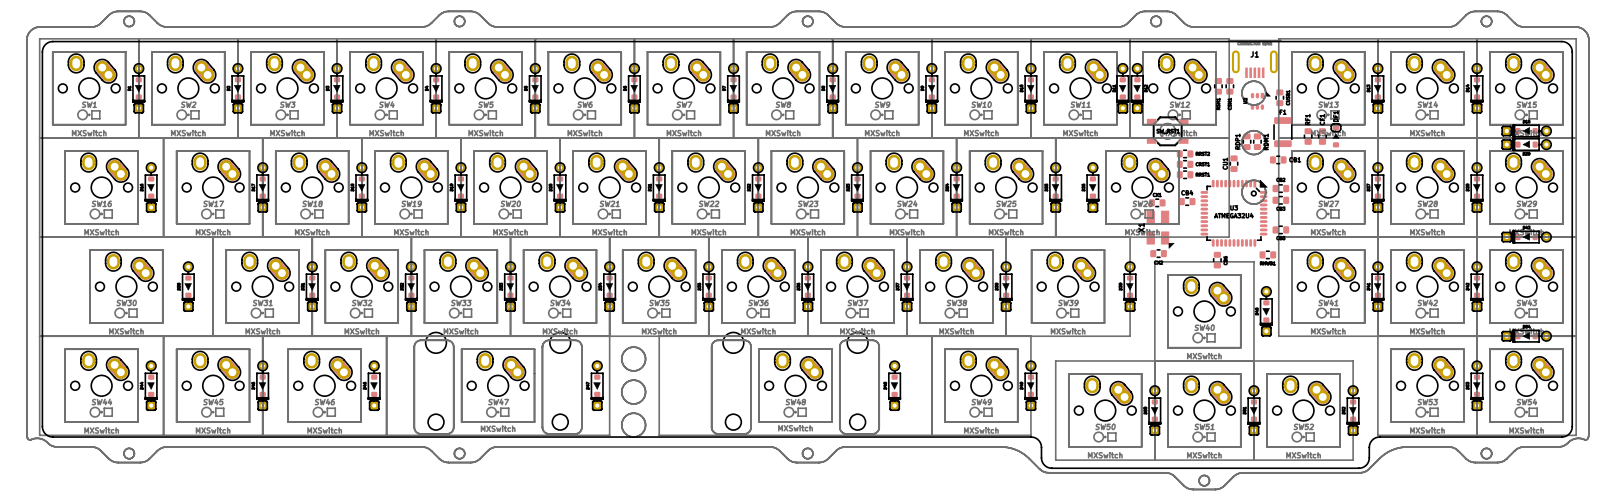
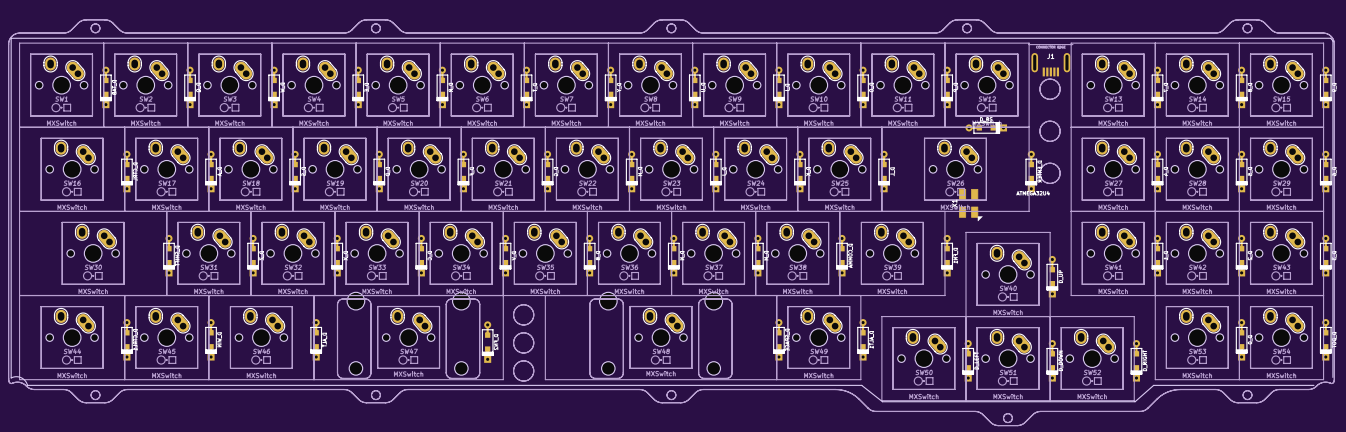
board edge: (52, 41) (45, 44) (42, 51) -> none
board edge: (52, 41) (1561, 41) -> none
board edge: (1561, 41) (1569, 44) (1572, 51) (1571, 430) (1567, 435) (1561, 437) (1378, 437) (1372, 440) (1369, 447) -> none
board edge: (42, 51) (42, 426) -> none
part: (1218, 86) -> none
part: (1229, 86) -> none
part: (138, 88) -> none
part: (237, 88) -> none
part: (337, 88) -> none
part: (436, 88) -> none
part: (535, 88) -> none
part: (634, 88) -> none
part: (733, 88) -> none
part: (832, 88) -> none
part: (931, 88) -> none
part: (1030, 88) -> none
part: (1122, 88) -> none
part: (1137, 88) -> none
part: (1377, 88) -> none
part: (1476, 88) -> none
part: none -> (105, 87)
part: none -> (190, 87)
part: none -> (274, 87)
part: none -> (358, 87)
part: none -> (442, 87)
part: none -> (526, 87)
part: none -> (610, 87)
part: none -> (694, 87)
part: none -> (778, 87)
part: none -> (863, 87)
part: none -> (947, 87)
part: none -> (1157, 87)
part: none -> (1241, 87)
part: none -> (1325, 87)
part: (1279, 97) -> none
part: (1260, 100) -> none
part: (1167, 131) -> none
part: (1526, 131) -> none
part: (1282, 132) -> none
part: (1336, 135) -> none
part: (1308, 136) -> none
part: (1322, 136) -> none
part: none -> (986, 127)
part: (1247, 141) -> none
part: (1257, 141) -> none
part: (1526, 144) -> none
part: (1185, 153) -> none
part: (1278, 159) -> none
part: (1234, 163) -> none
part: (1185, 164) -> none
part: (1185, 174) -> none
part: (151, 187) -> none
part: (262, 187) -> none
part: (361, 187) -> none
part: (460, 187) -> none
part: (560, 187) -> none
part: (659, 187) -> none
part: (758, 187) -> none
part: (857, 187) -> none
part: (956, 187) -> none
part: (1055, 187) -> none
part: (1092, 187) -> none
part: (1377, 187) -> none
part: (1476, 187) -> none
part: (1280, 188) -> none
part: none -> (126, 171)
part: none -> (211, 171)
part: none -> (295, 171)
part: none -> (379, 171)
part: none -> (463, 171)
part: none -> (547, 171)
part: none -> (631, 171)
part: none -> (715, 171)
part: none -> (799, 171)
part: none -> (884, 171)
part: none -> (1031, 171)
part: none -> (1157, 171)
part: none -> (1241, 171)
part: none -> (1325, 171)
part: (1280, 200) -> none
part: (1187, 201) -> none
part: (1157, 202) -> none
part: (1234, 213) -> none
part: (1280, 229) -> none
part: (1526, 237) -> none
part: (1158, 253) -> none
part: (1267, 254) -> none
part: (1217, 260) -> none
part: (188, 286) -> none
part: (312, 286) -> none
part: (411, 286) -> none
part: (510, 286) -> none
part: (609, 286) -> none
part: (708, 286) -> none
part: (807, 286) -> none
part: (906, 286) -> none
part: (1006, 286) -> none
part: (1130, 286) -> none
part: (1377, 286) -> none
part: (1476, 286) -> none
part: none -> (168, 255)
part: none -> (253, 255)
part: none -> (337, 255)
part: none -> (421, 255)
part: none -> (505, 255)
part: none -> (589, 255)
part: none -> (673, 255)
part: none -> (757, 255)
part: none -> (842, 255)
part: none -> (947, 255)
part: none -> (1157, 255)
part: none -> (1241, 255)
part: none -> (1325, 255)
part: (1266, 311) -> none
part: none -> (1052, 276)
part: (1526, 336) -> none
part: (151, 385) -> none
part: (262, 385) -> none
part: (374, 385) -> none
part: (597, 385) -> none
part: (894, 385) -> none
part: (1030, 385) -> none
part: (1476, 385) -> none
part: none -> (126, 339)
part: none -> (211, 339)
part: none -> (316, 339)
part: none -> (778, 339)
part: none -> (863, 339)
part: none -> (1241, 339)
part: none -> (1325, 339)
part: none -> (487, 342)
part: (1154, 410) -> none
part: (1253, 410) -> none
part: (1353, 410) -> none
part: none -> (968, 360)
part: none -> (1052, 360)
part: none -> (1136, 360)
board edge: (42, 426) (45, 433) (52, 437) (1031, 437) (1040, 442) (1042, 461) (1046, 466) (1051, 468) (1360, 468) (1368, 461) (1369, 447) -> none
board edge: none -> (1332, 377) (1332, 40) (1330, 38) (11, 38) (11, 377)
board edge: none -> (11, 377) (21, 377) (27, 385) (861, 385) (882, 401) (1135, 401) (1153, 385) (1313, 385)

